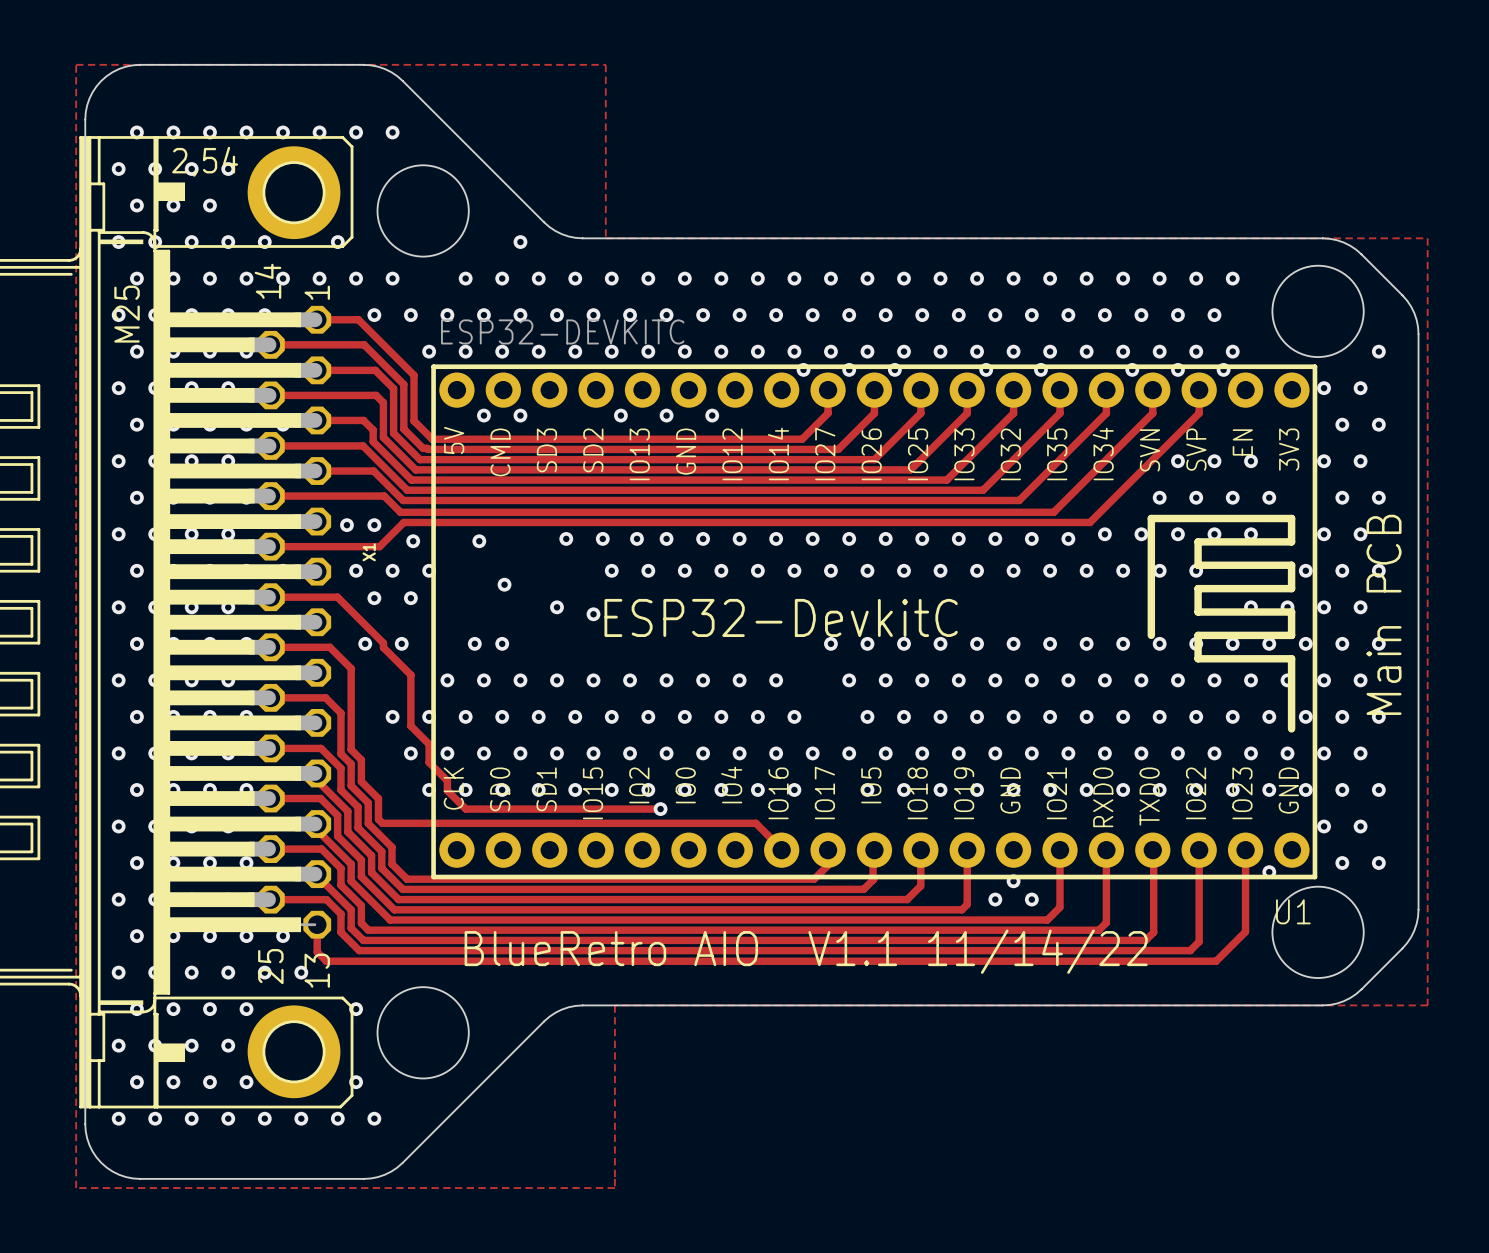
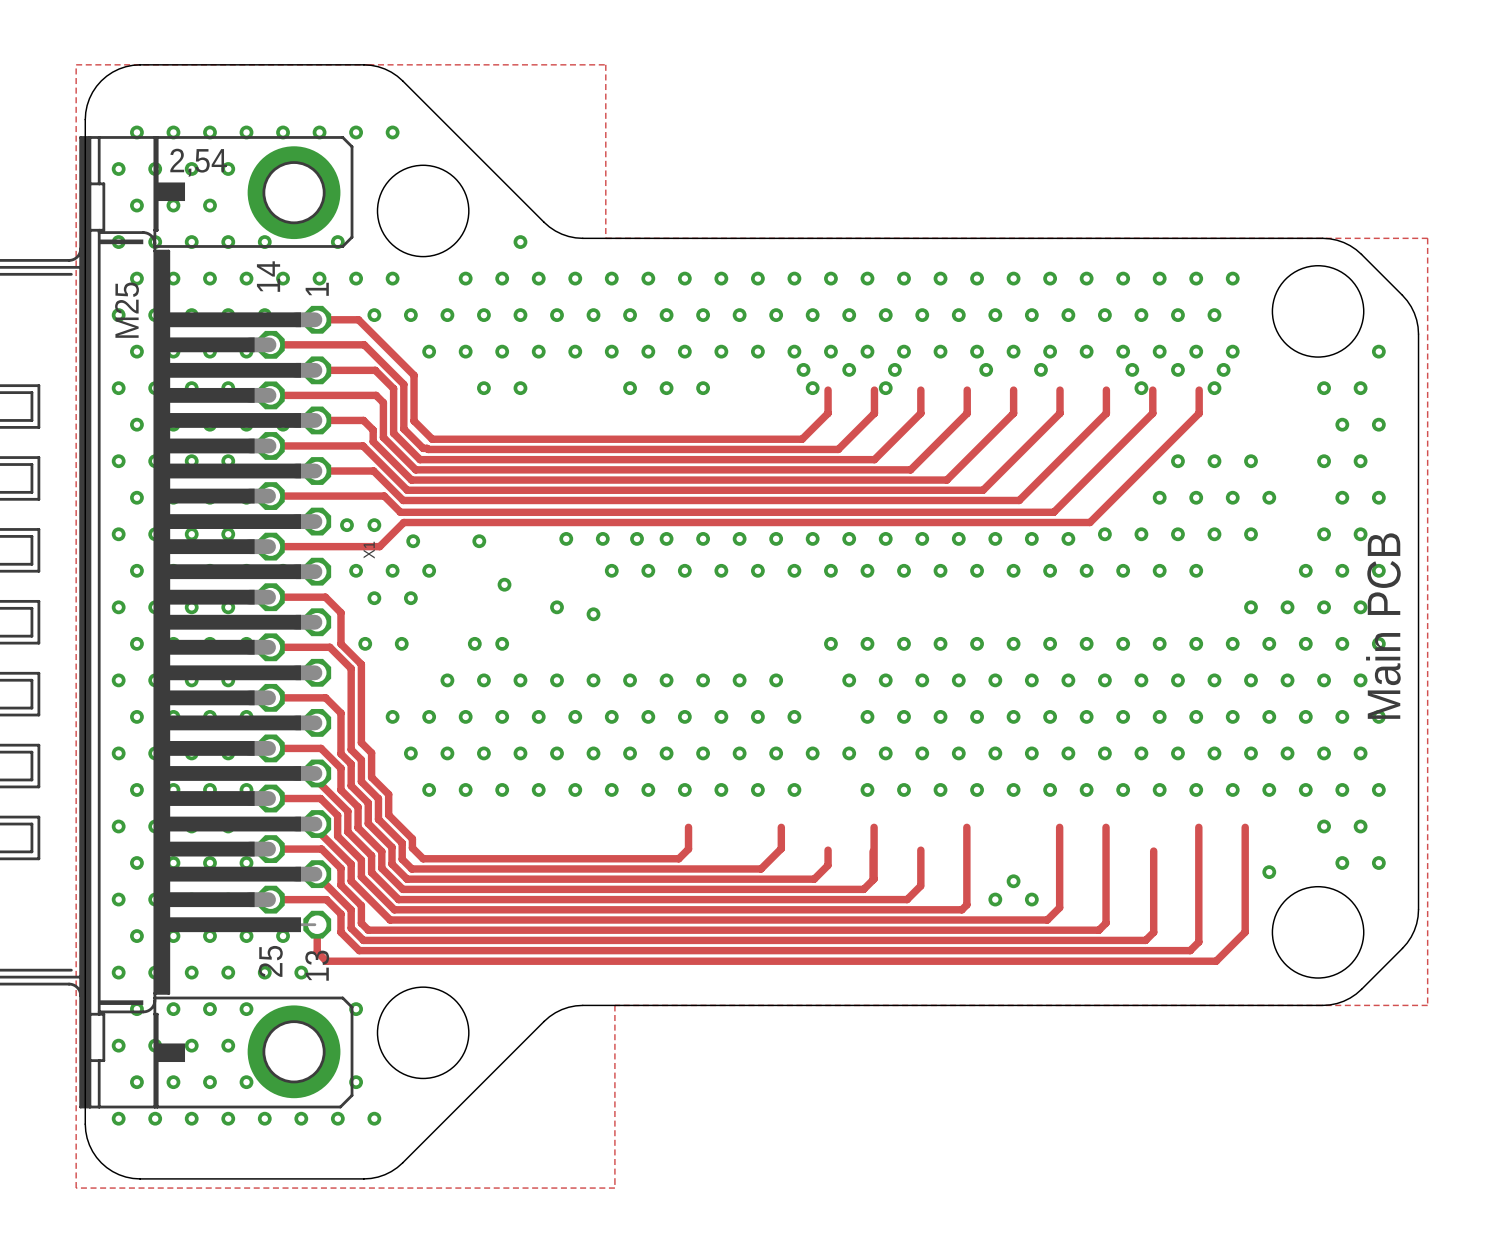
via: none -> (483, 388)
via: none -> (520, 388)
via: none -> (630, 388)
via: none -> (666, 388)
via: none -> (703, 388)
via: none -> (812, 388)
via: none -> (885, 388)
via: none -> (1141, 388)
via: none -> (1214, 388)
via: (483, 415) -> none
via: (520, 415) -> none
via: (620, 415) -> none
via: (666, 415) -> none
via: (712, 415) -> none
track: (325, 597) (337, 597) (383, 643) (383, 647) (410, 675) (410, 726) (429, 744) (429, 762) (447, 780) (447, 790) (465, 809) (660, 809) -> (325, 597) (340, 612) (340, 643) (361, 664) (361, 742) (371, 752) (371, 777) (388, 794) (388, 815) (412, 838) (412, 848) (423, 858) (678, 858) (688, 849) (688, 827)
U1: (874, 621) -> none
via: (660, 809) -> none
track: (382, 823) (755, 823) (781, 848) -> (382, 823) (402, 843) (402, 859) (411, 868) (761, 868) (781, 848) (781, 827)
track: none -> (874, 827) (874, 878)
track: (967, 850) (966, 904) -> (966, 827) (966, 904)
track: (1060, 850) (1059, 907) -> (1059, 827) (1059, 907)
track: (1106, 850) (1106, 923) -> (1106, 827) (1106, 923)
track: (1199, 850) (1198, 942) -> (1198, 827) (1198, 942)
track: (1245, 850) (1245, 932) -> (1245, 827) (1245, 932)
text: BlueRetro AIO V1.1 11/14/22 (806, 951) -> none

